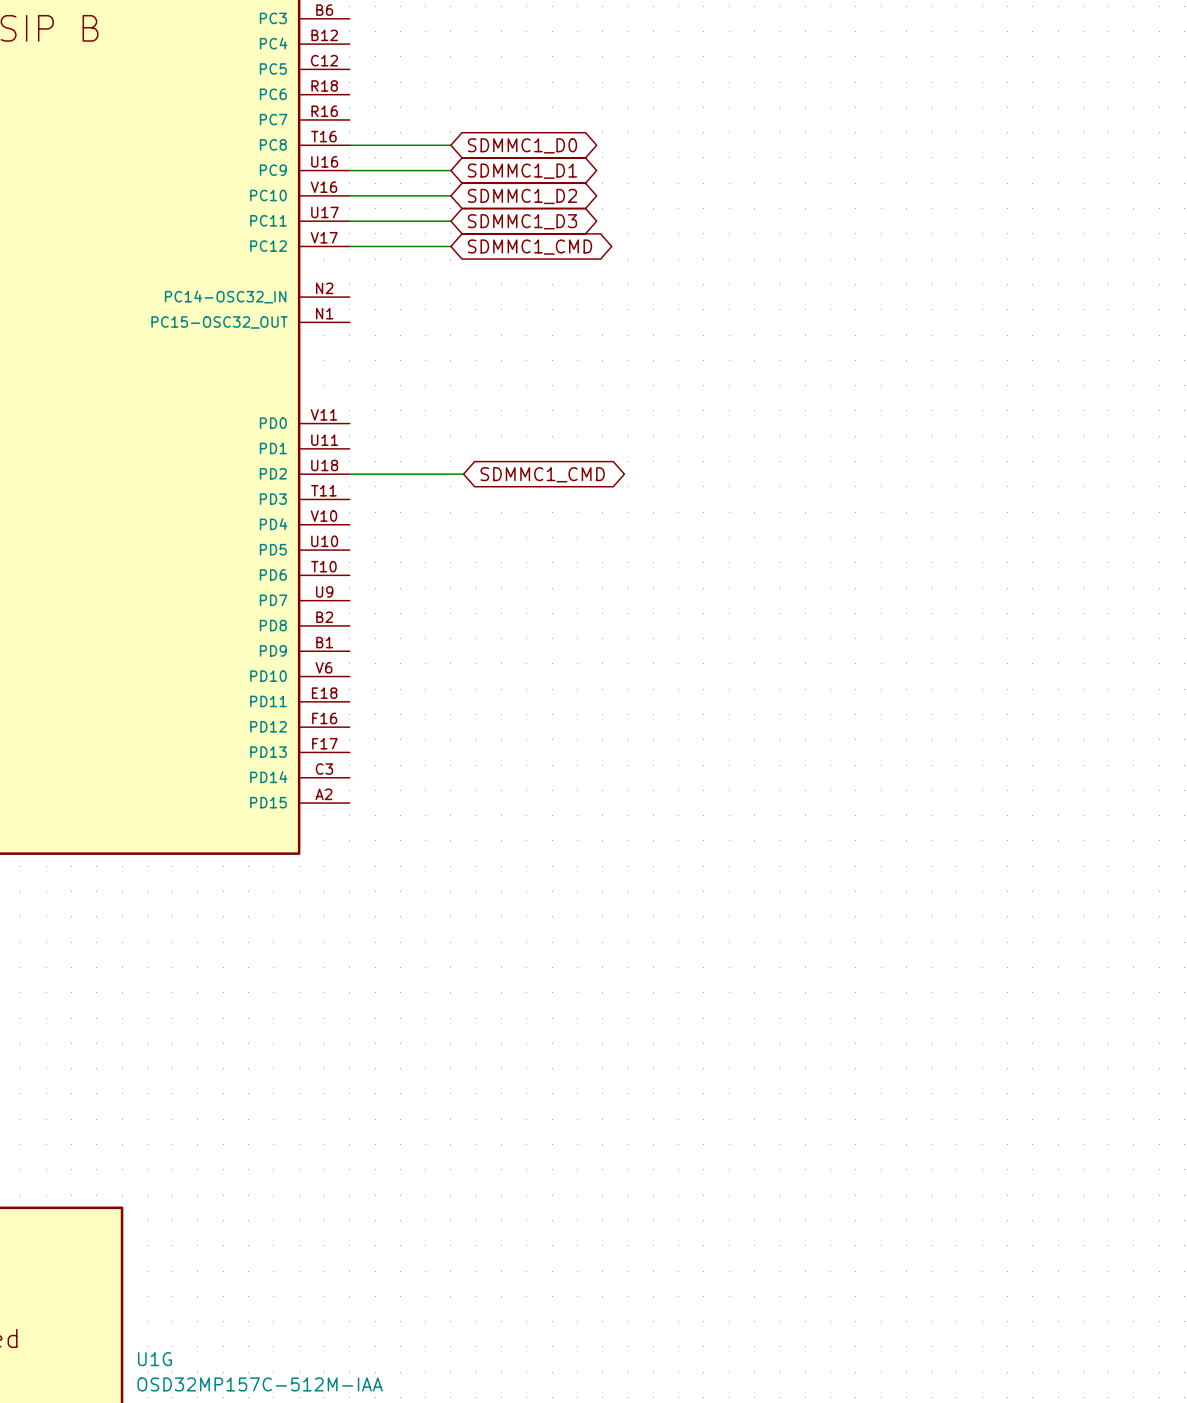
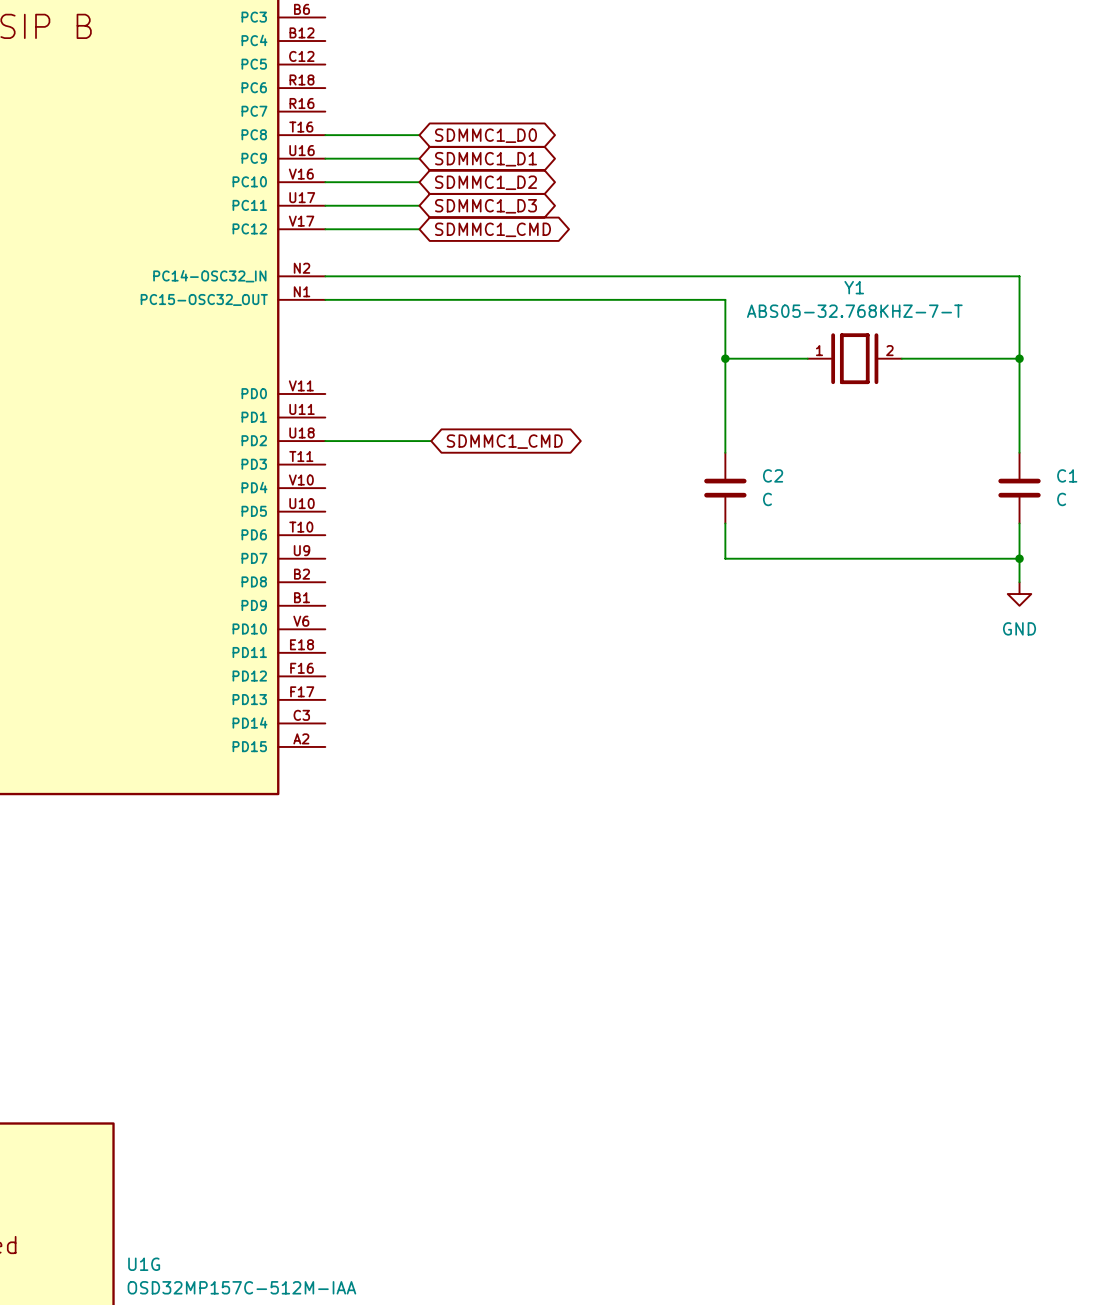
wire: none -> (325, 276) (1019, 276) (1019, 452)
wire: none -> (325, 299) (725, 299) (725, 452)
wire: none -> (725, 358) (807, 358)
junction: none -> (725, 358)
Y1: none -> ABS05-32.768KHZ-7-T (854, 358)
wire: none -> (901, 358) (1019, 358)
junction: none -> (1019, 358)
C2: none -> C (725, 488)
C1: none -> C (1019, 488)
wire: none -> (725, 523) (725, 558) (1019, 558)
wire: none -> (1019, 523) (1019, 582)
junction: none -> (1019, 558)
power symbol: none -> GND (1019, 594)

